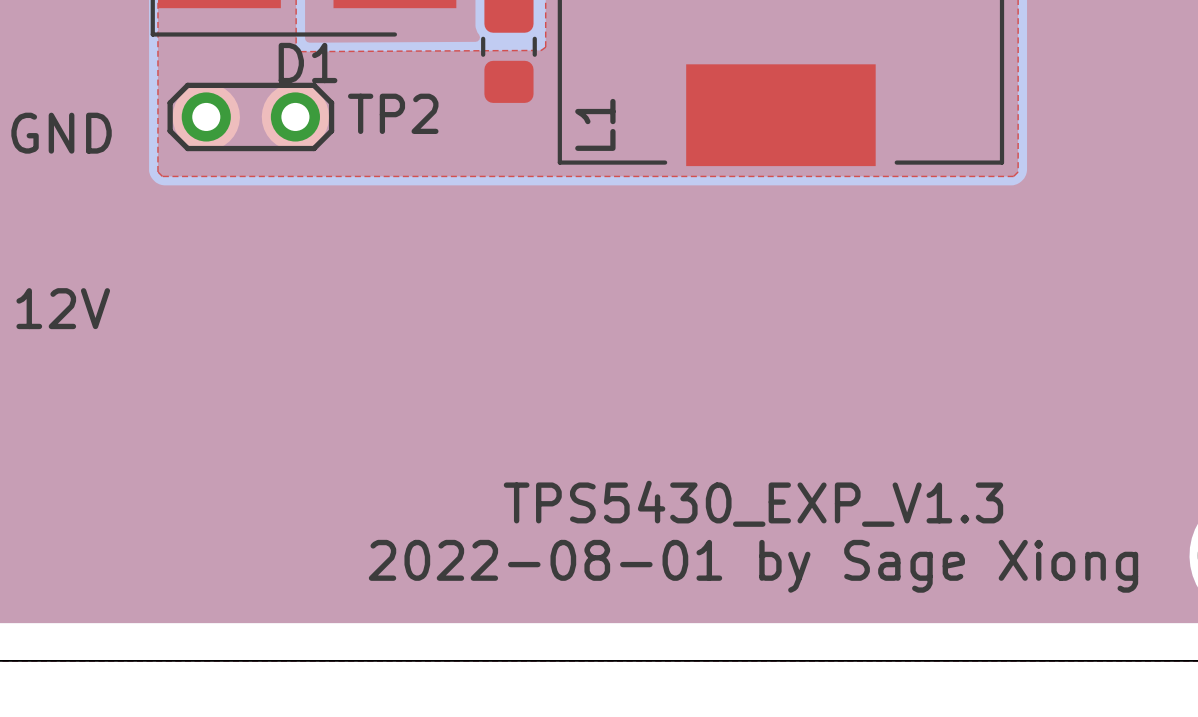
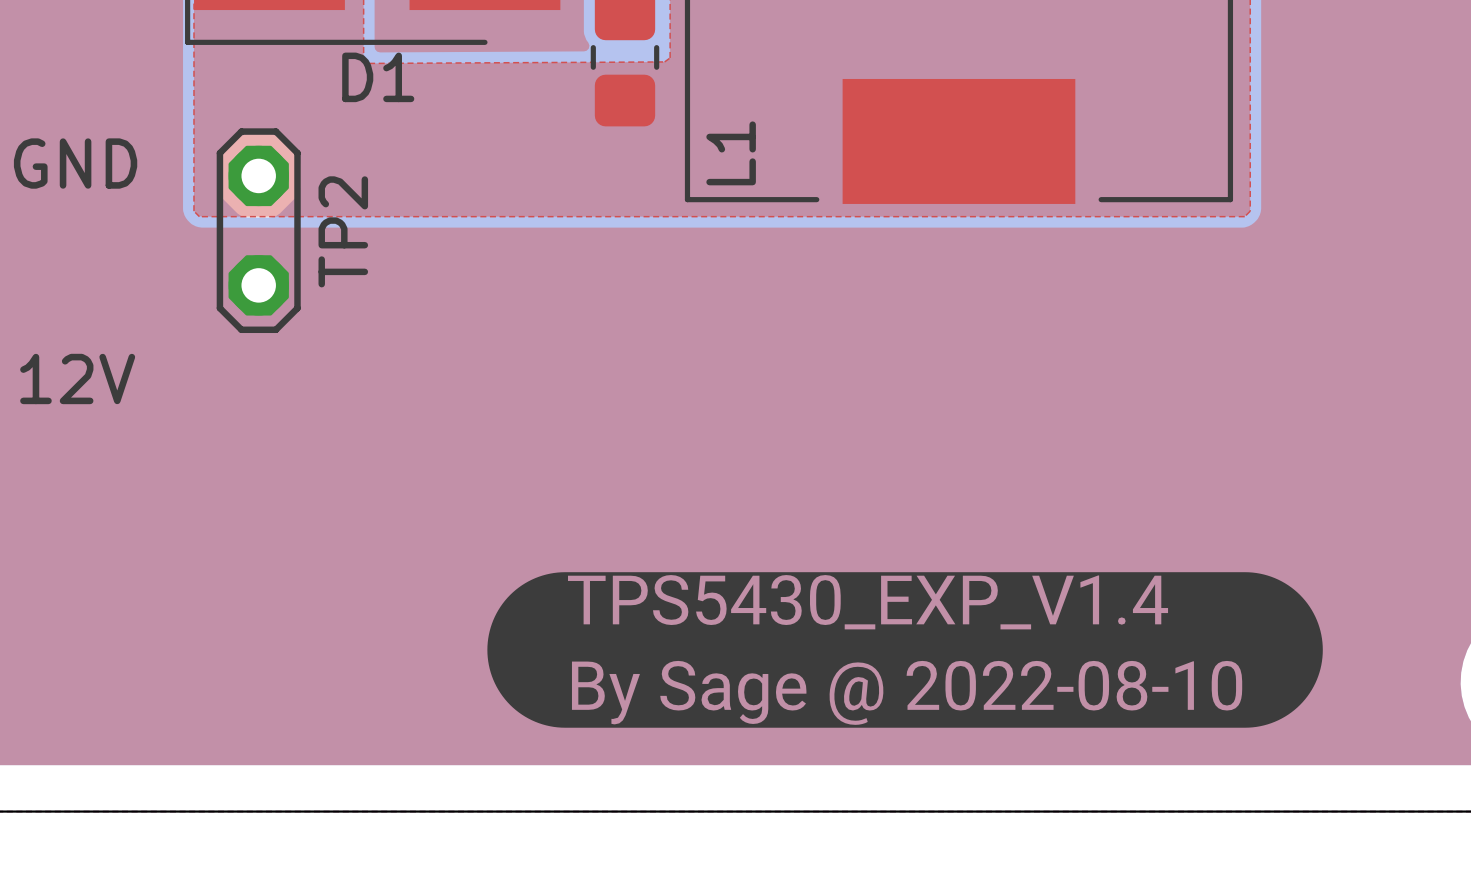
TP2 footprint: [167, 82, 335, 152] -> [216, 128, 301, 334]
TP2 name position: TP2 (393, 113) -> TP2 (343, 231)
drawing: none -> [487, 572, 1323, 728]
text: TPS5430_EXP_V1.3 (753, 503) -> none
text: 2022-08-01 by Sage Xiong (753, 566) -> none

